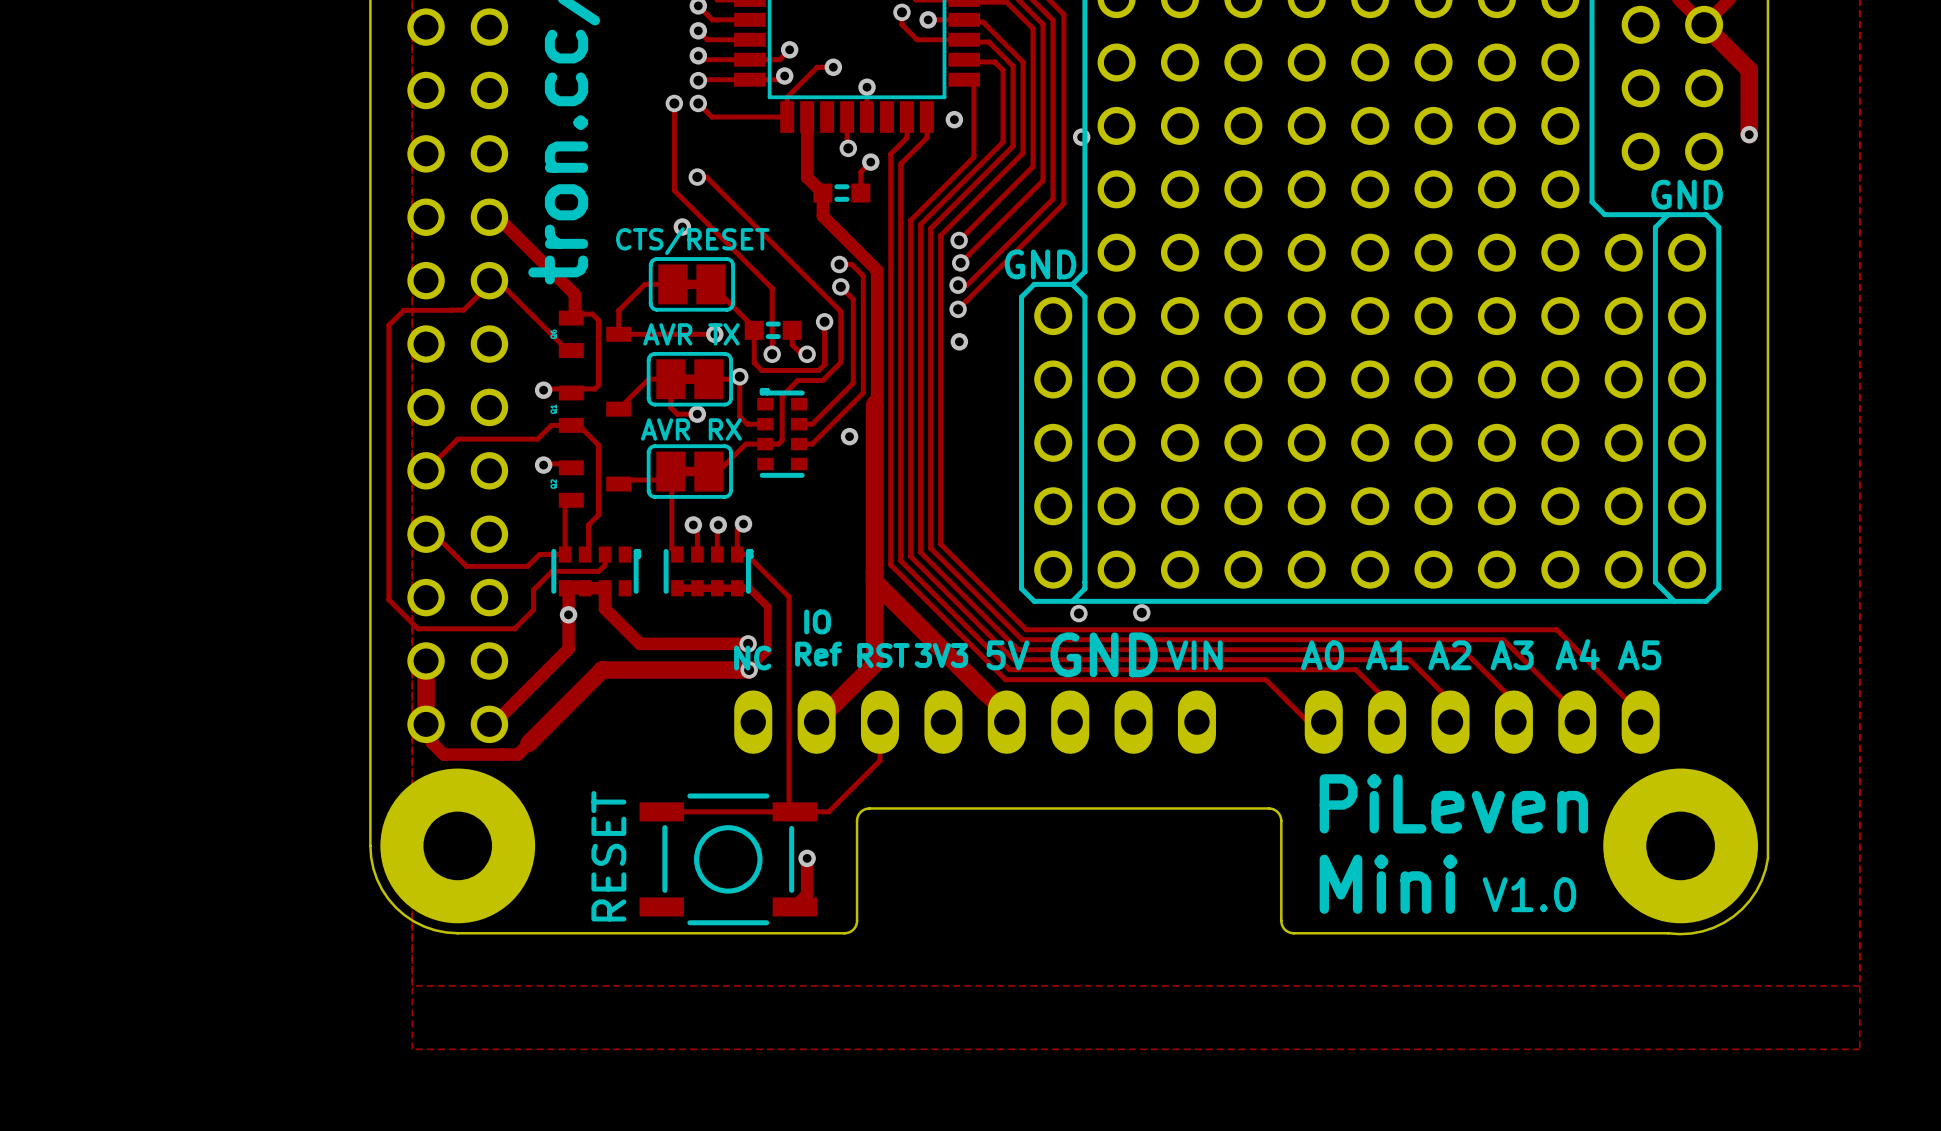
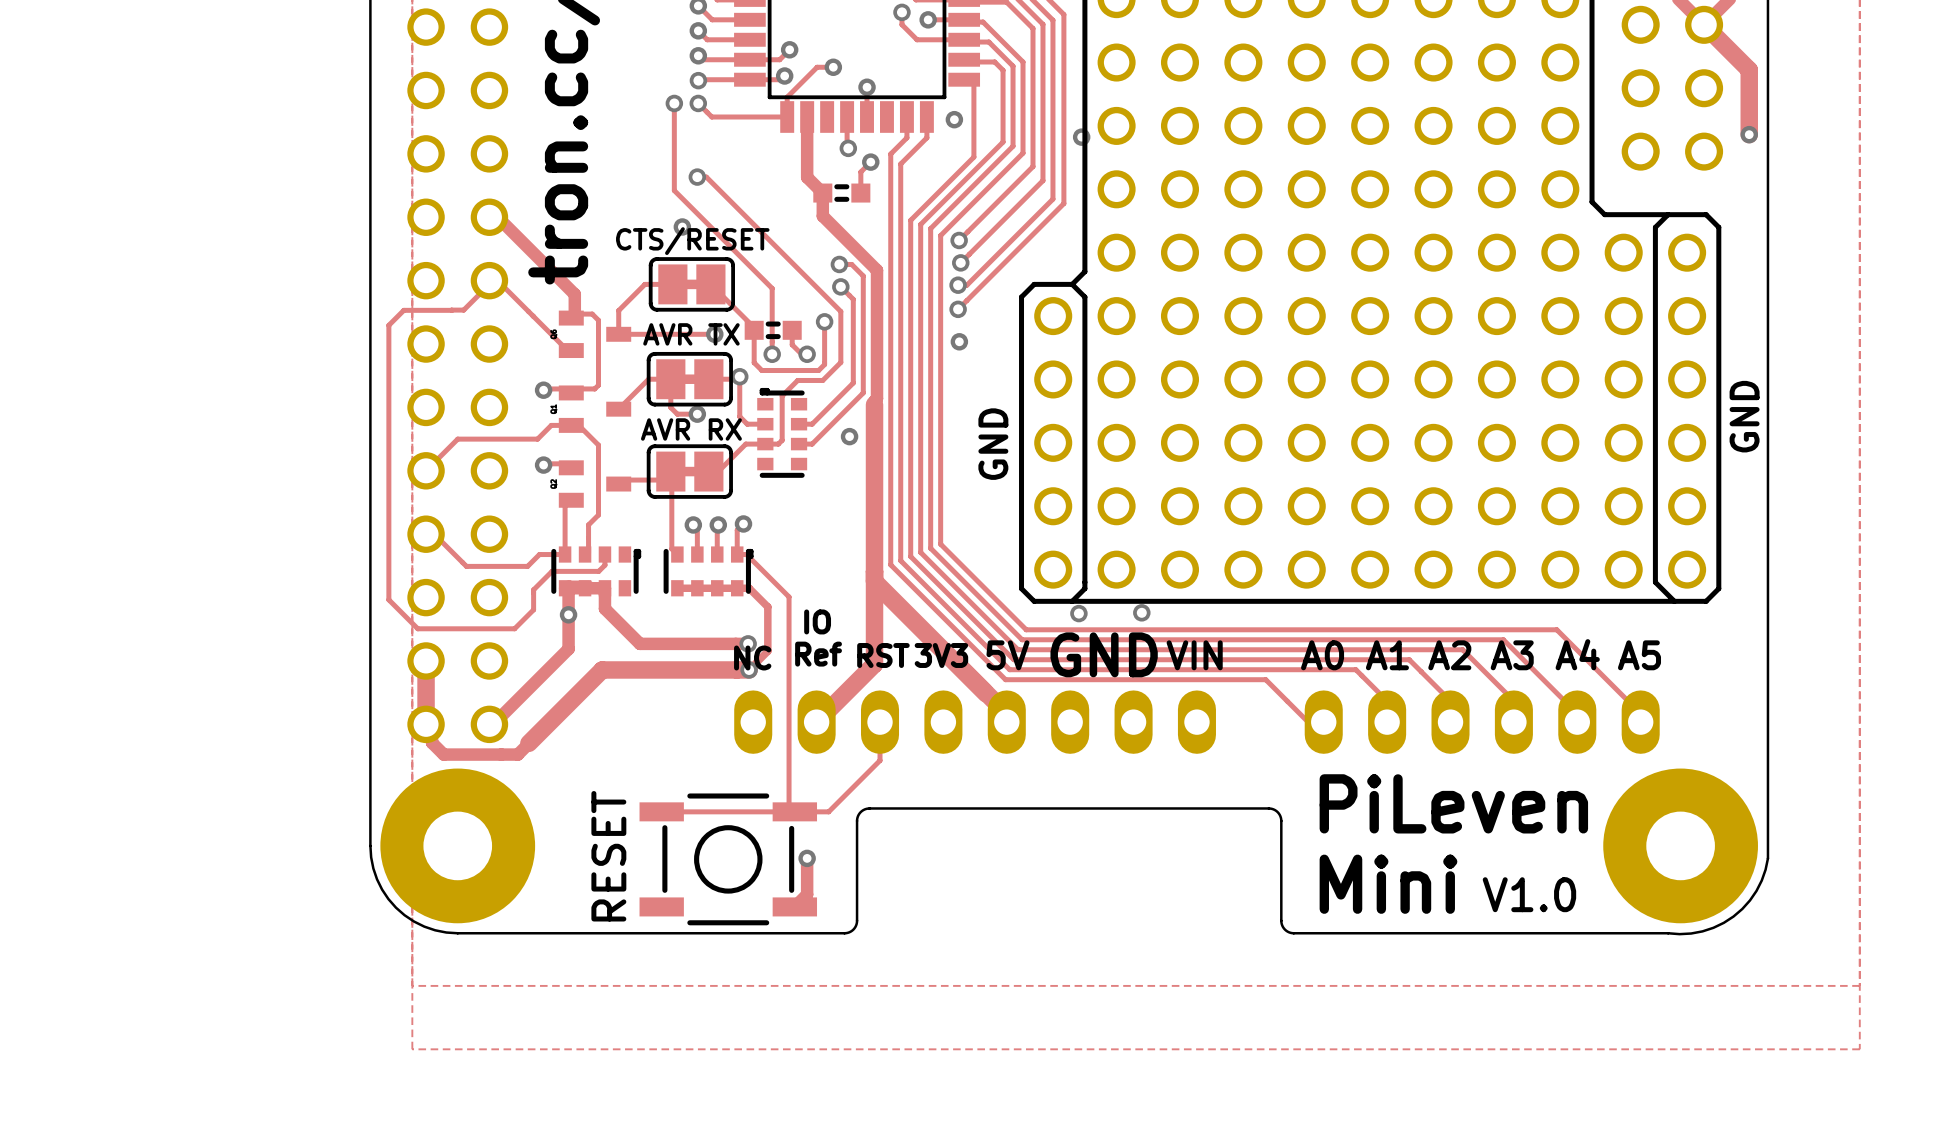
text rotation: 0° (1687, 194) -> 90° counterclockwise (1744, 416)
text position: GND (1687, 194) -> GND (1744, 416)
text rotation: 0° (1040, 264) -> 90° counterclockwise (993, 444)
text position: GND (1040, 264) -> GND (993, 444)

